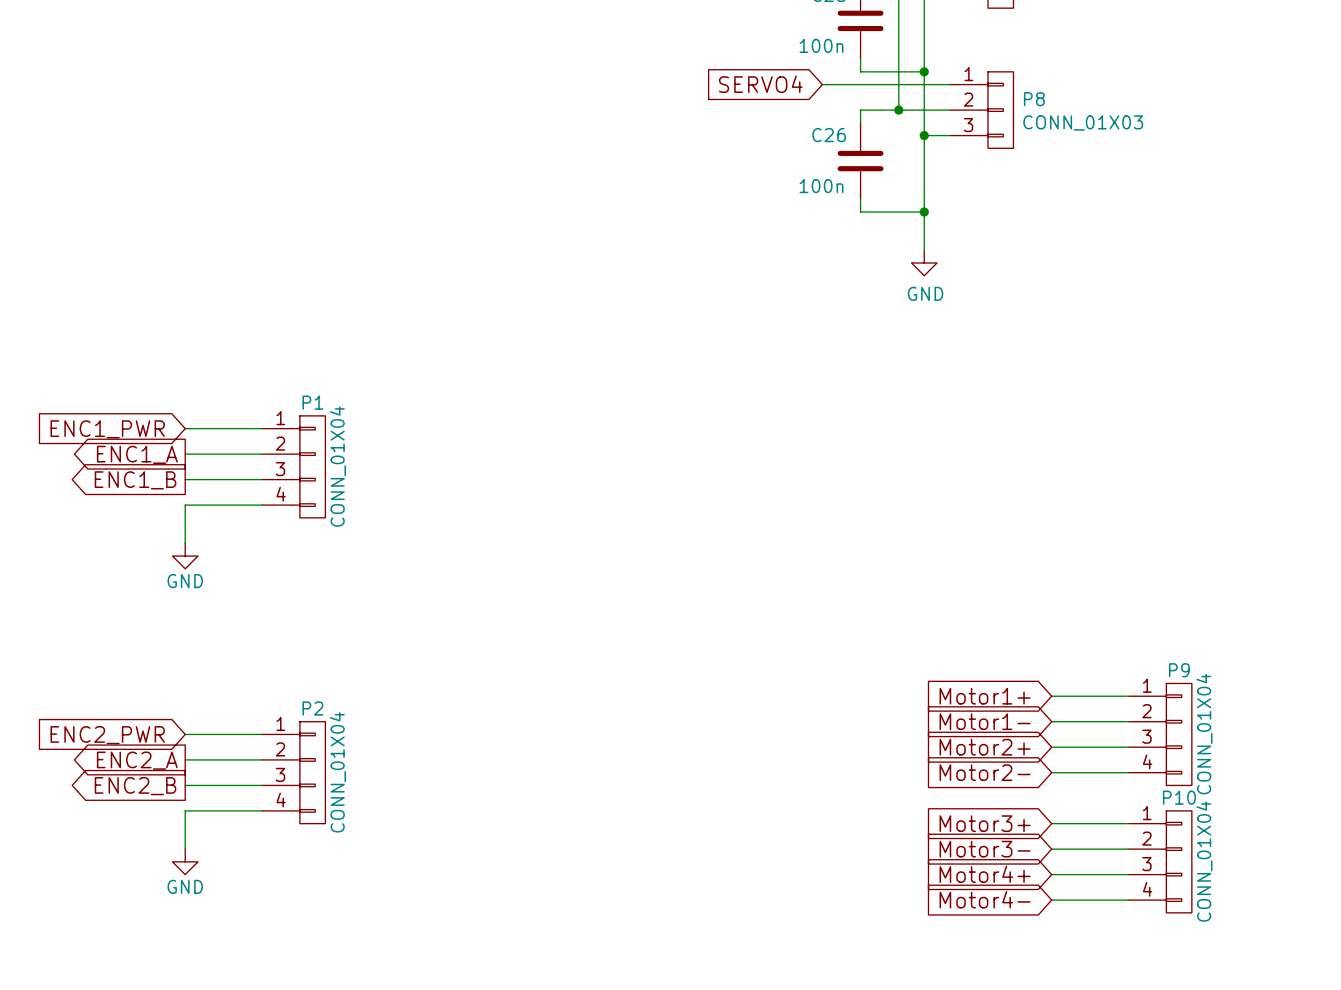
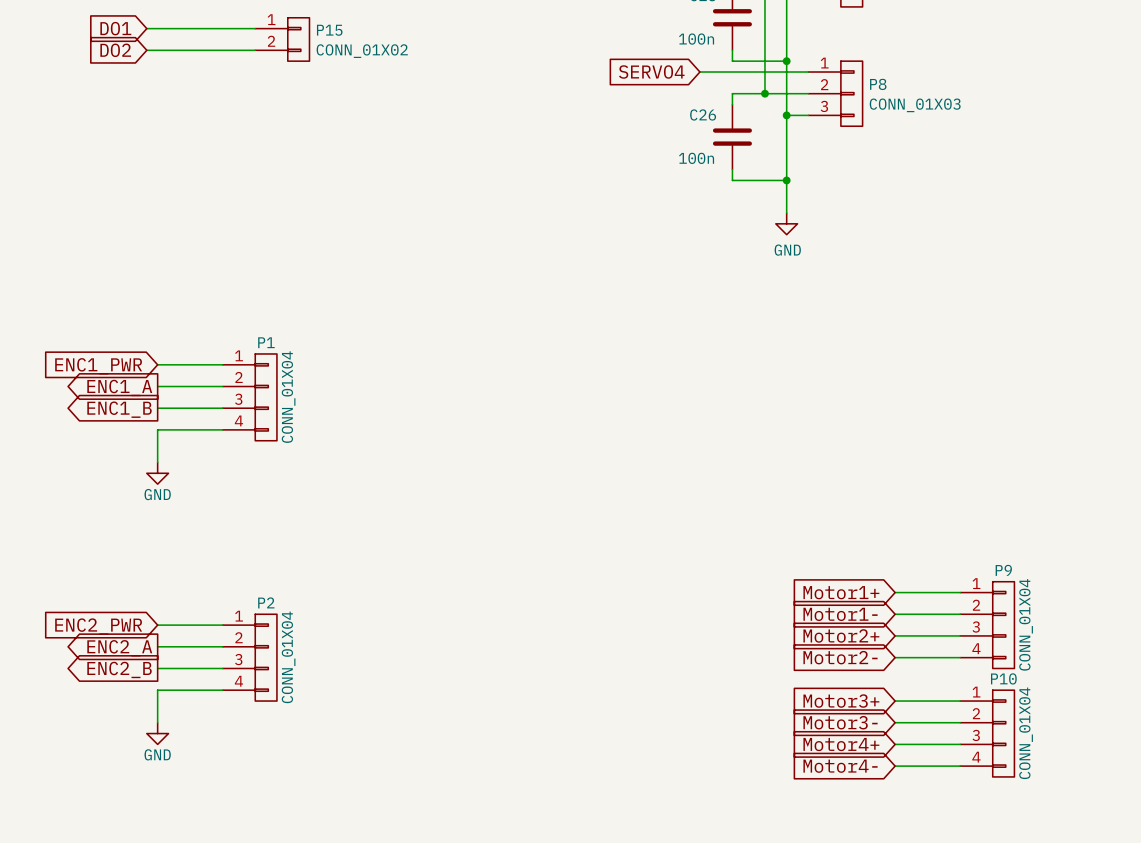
global label: none -> DO1 (115, 28)
wire: none -> (146, 28) (255, 28)
P15: none -> CONN_01X02 (282, 39)
global label: none -> DO2 (115, 50)
wire: none -> (146, 50) (255, 50)

